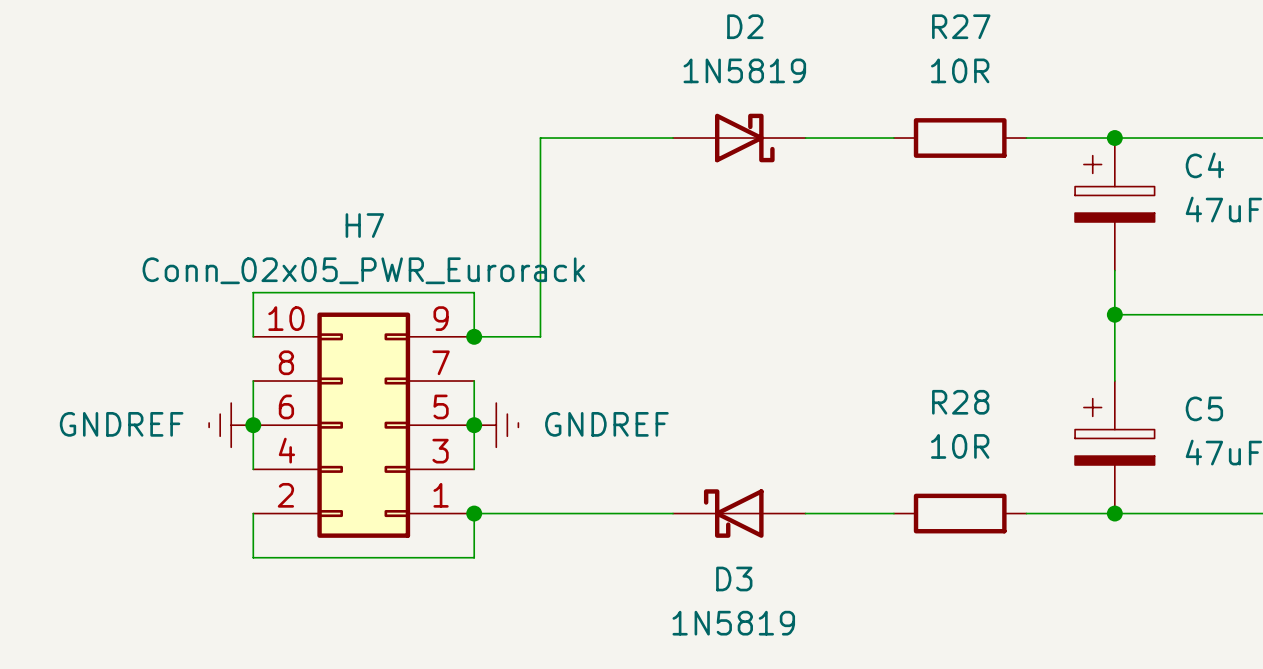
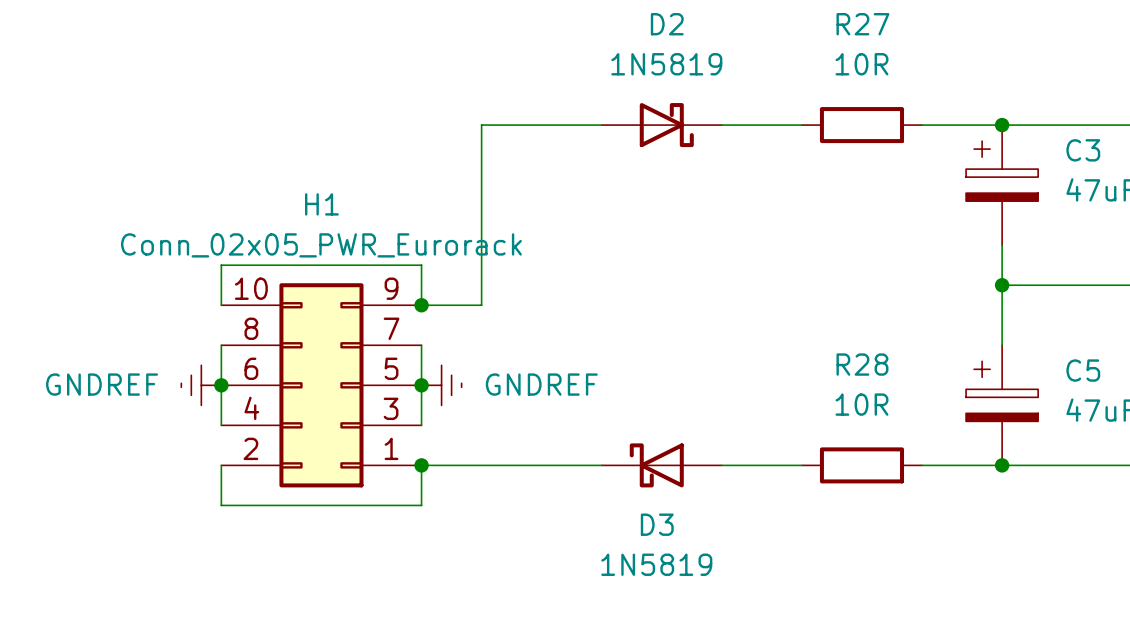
C4 name: C4 (1204, 165) -> C3 (1083, 150)
H7 name: H7 (364, 225) -> H1 (321, 204)

